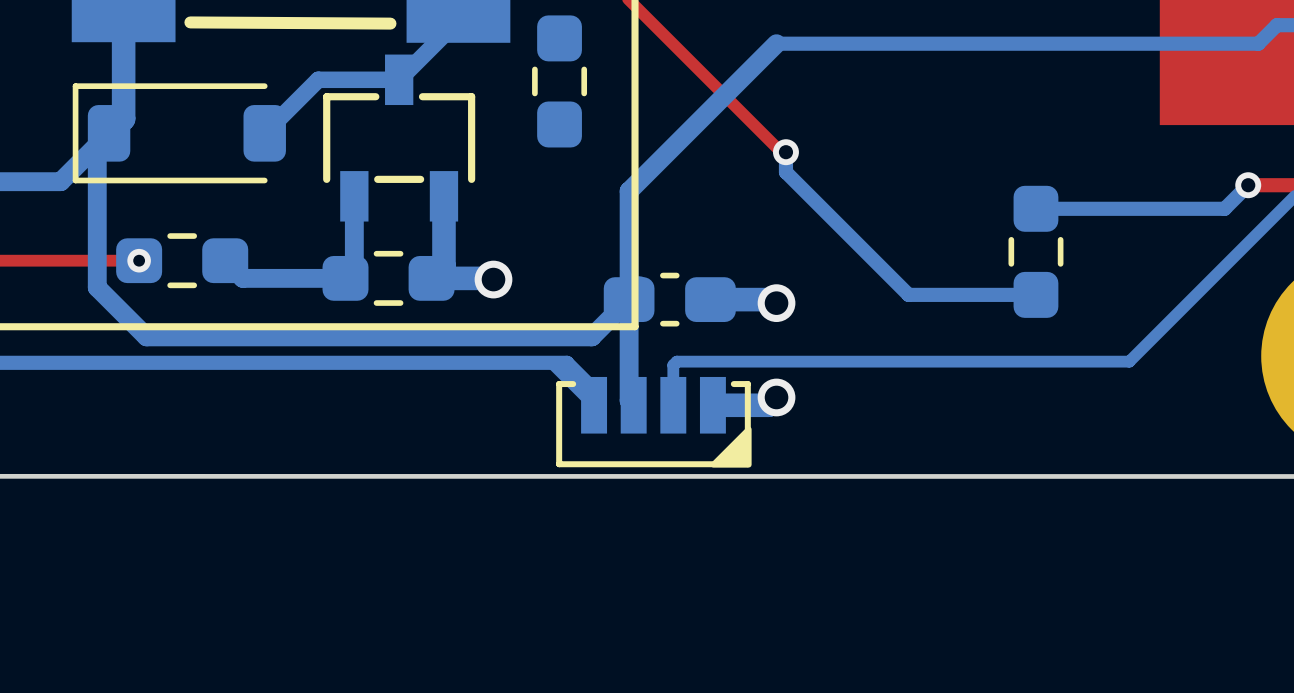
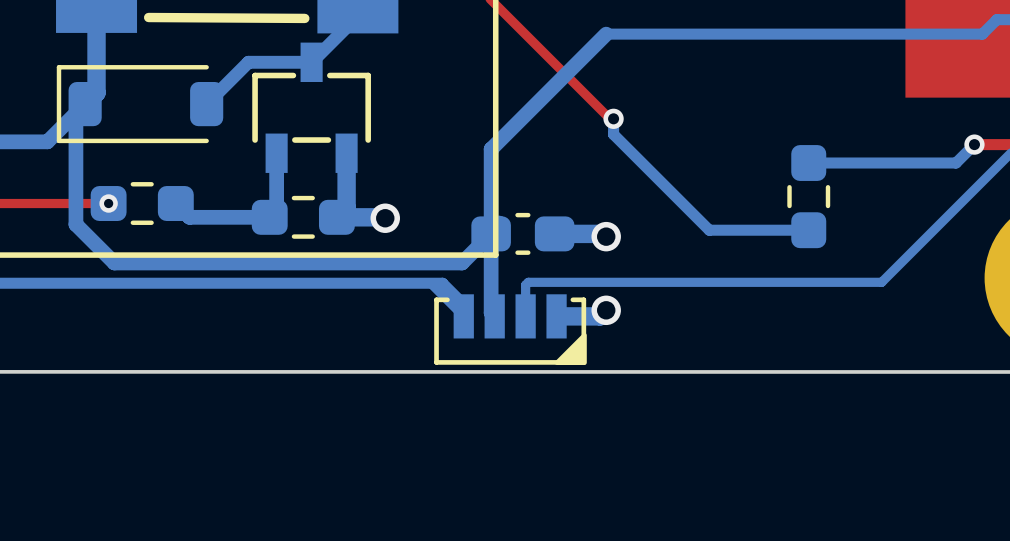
part: (559, 81) -> none

